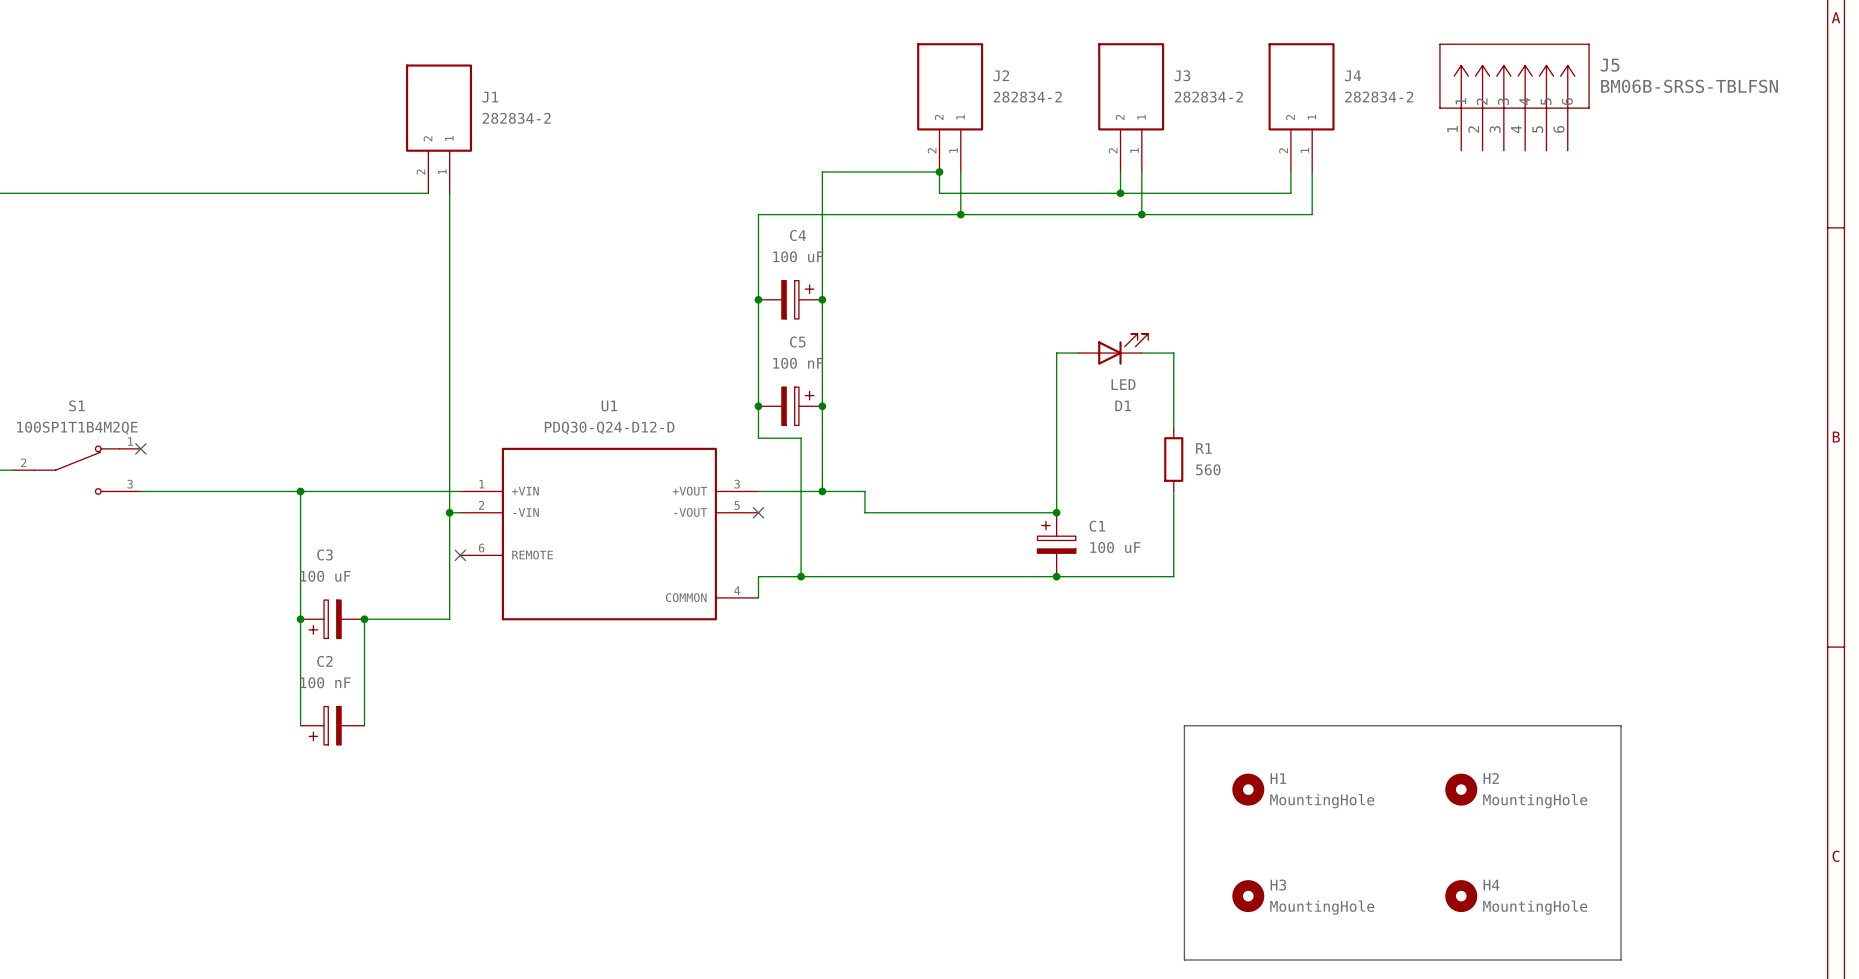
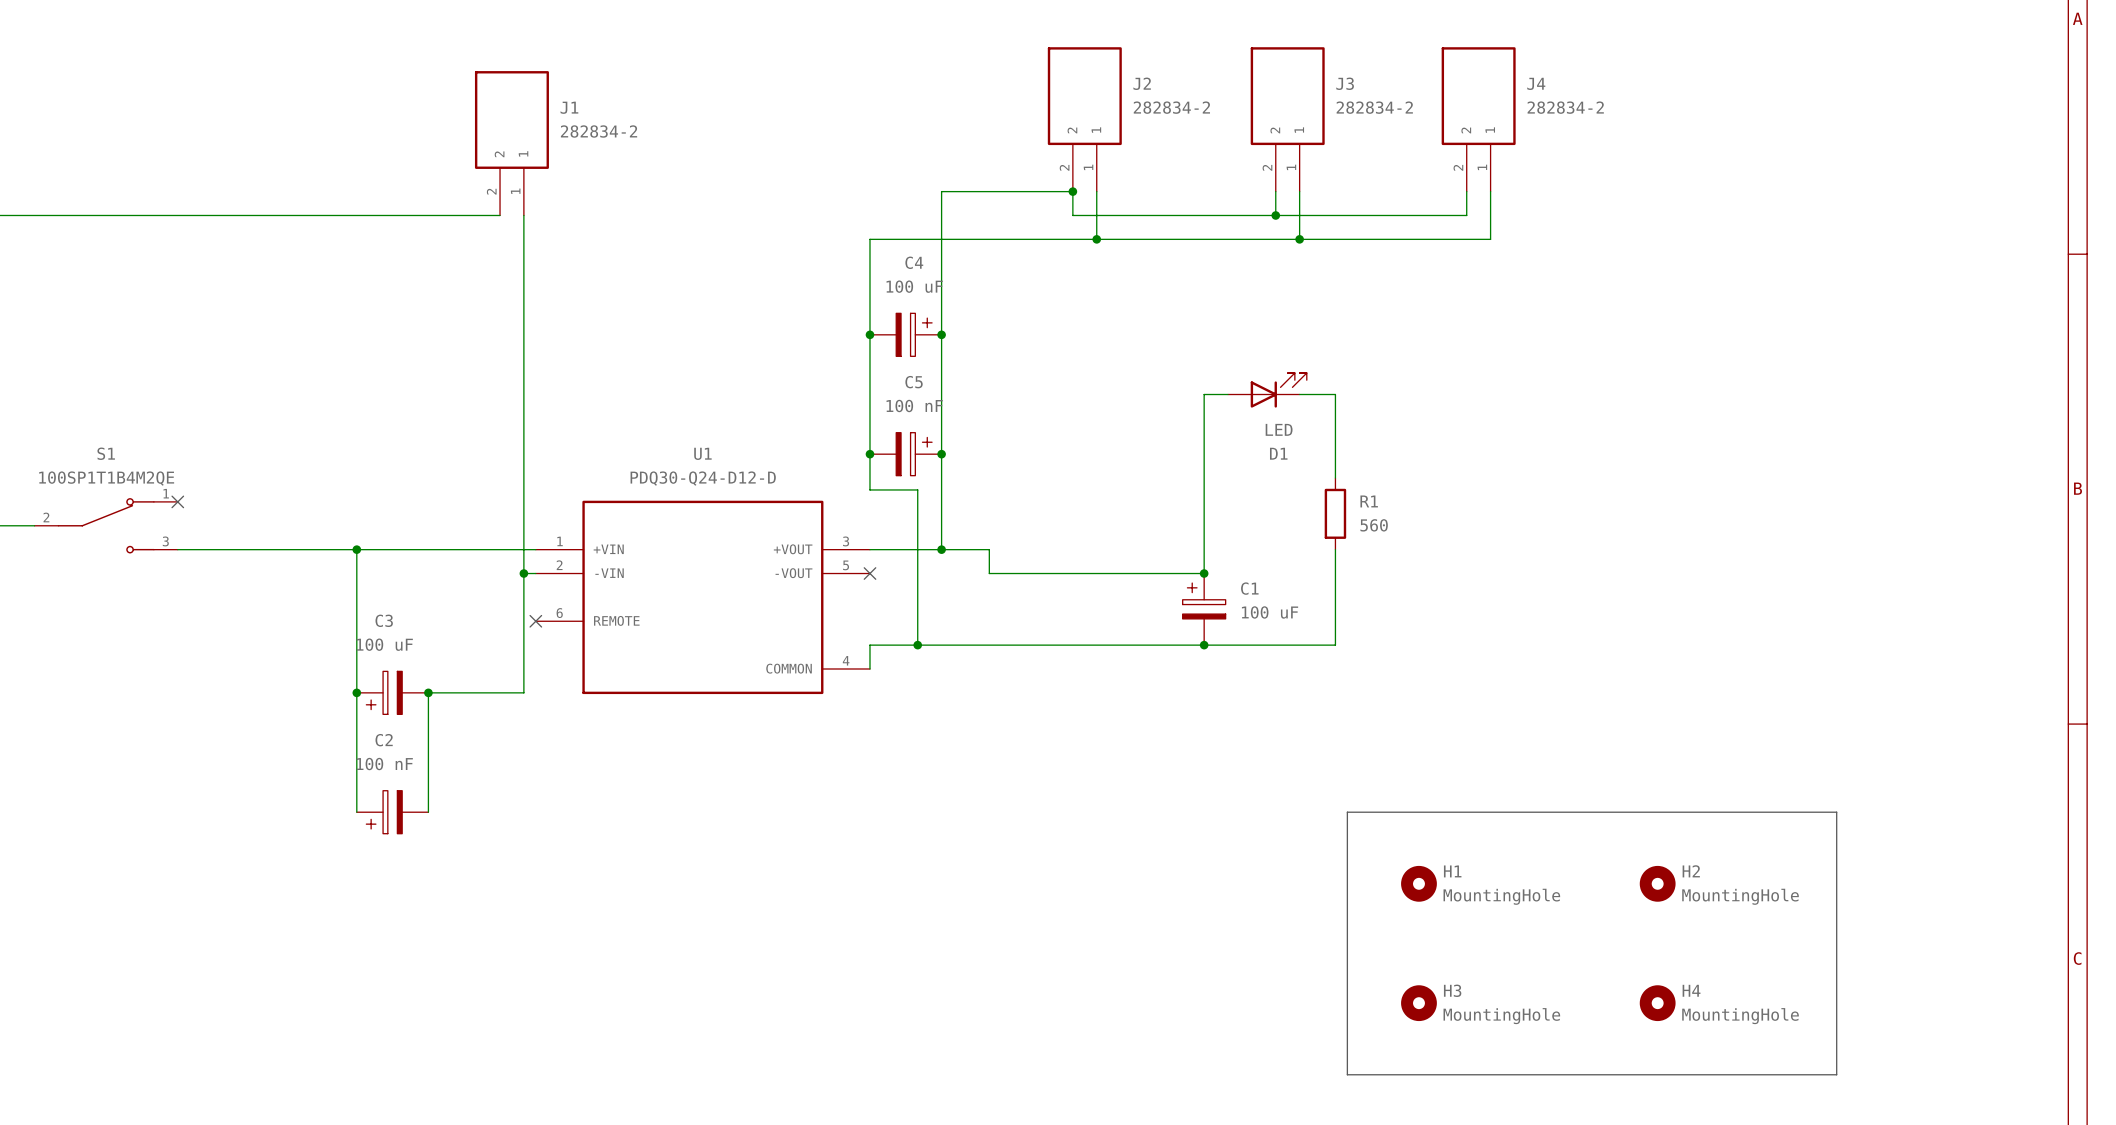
J5: BM06B-SRSS-TBLFSN (1514, 97) -> none

